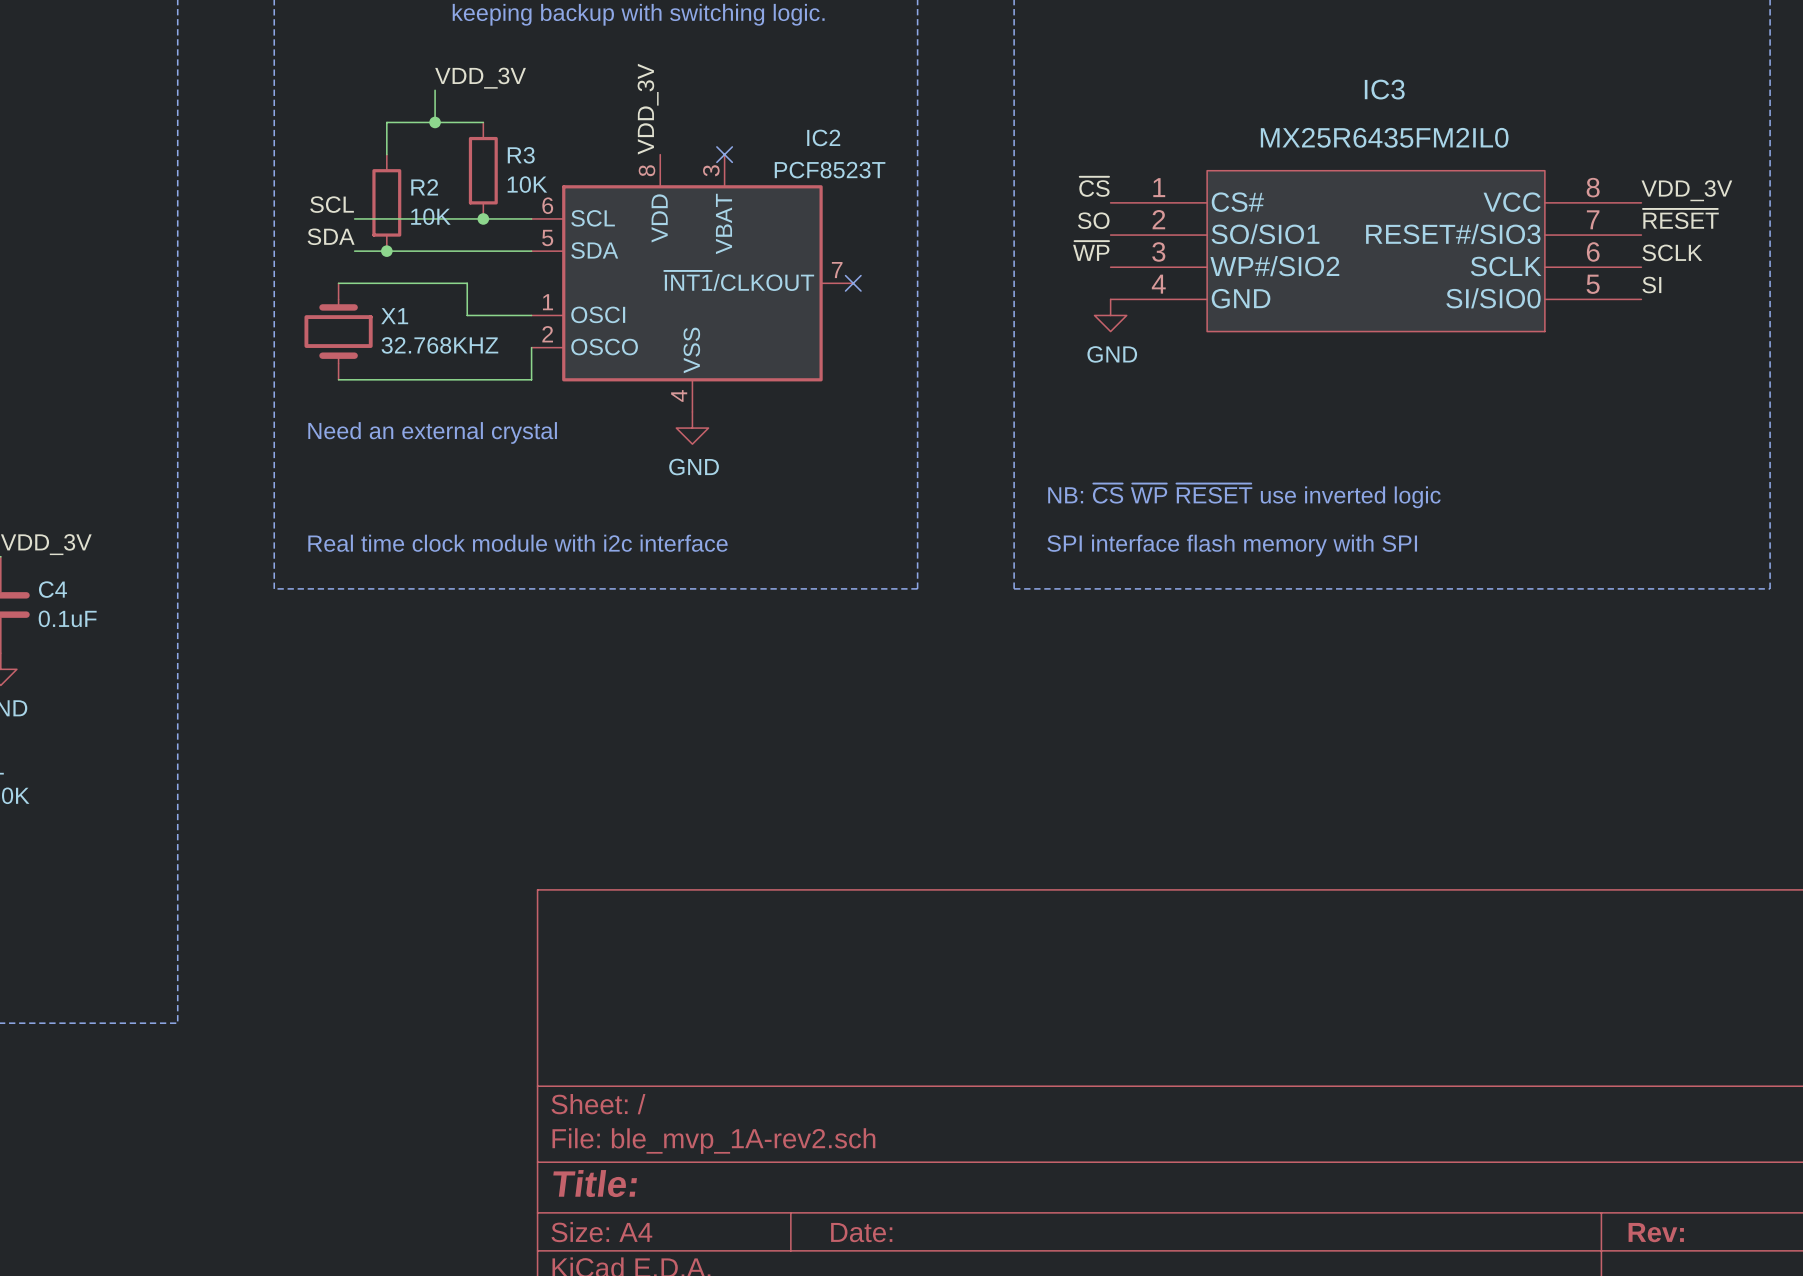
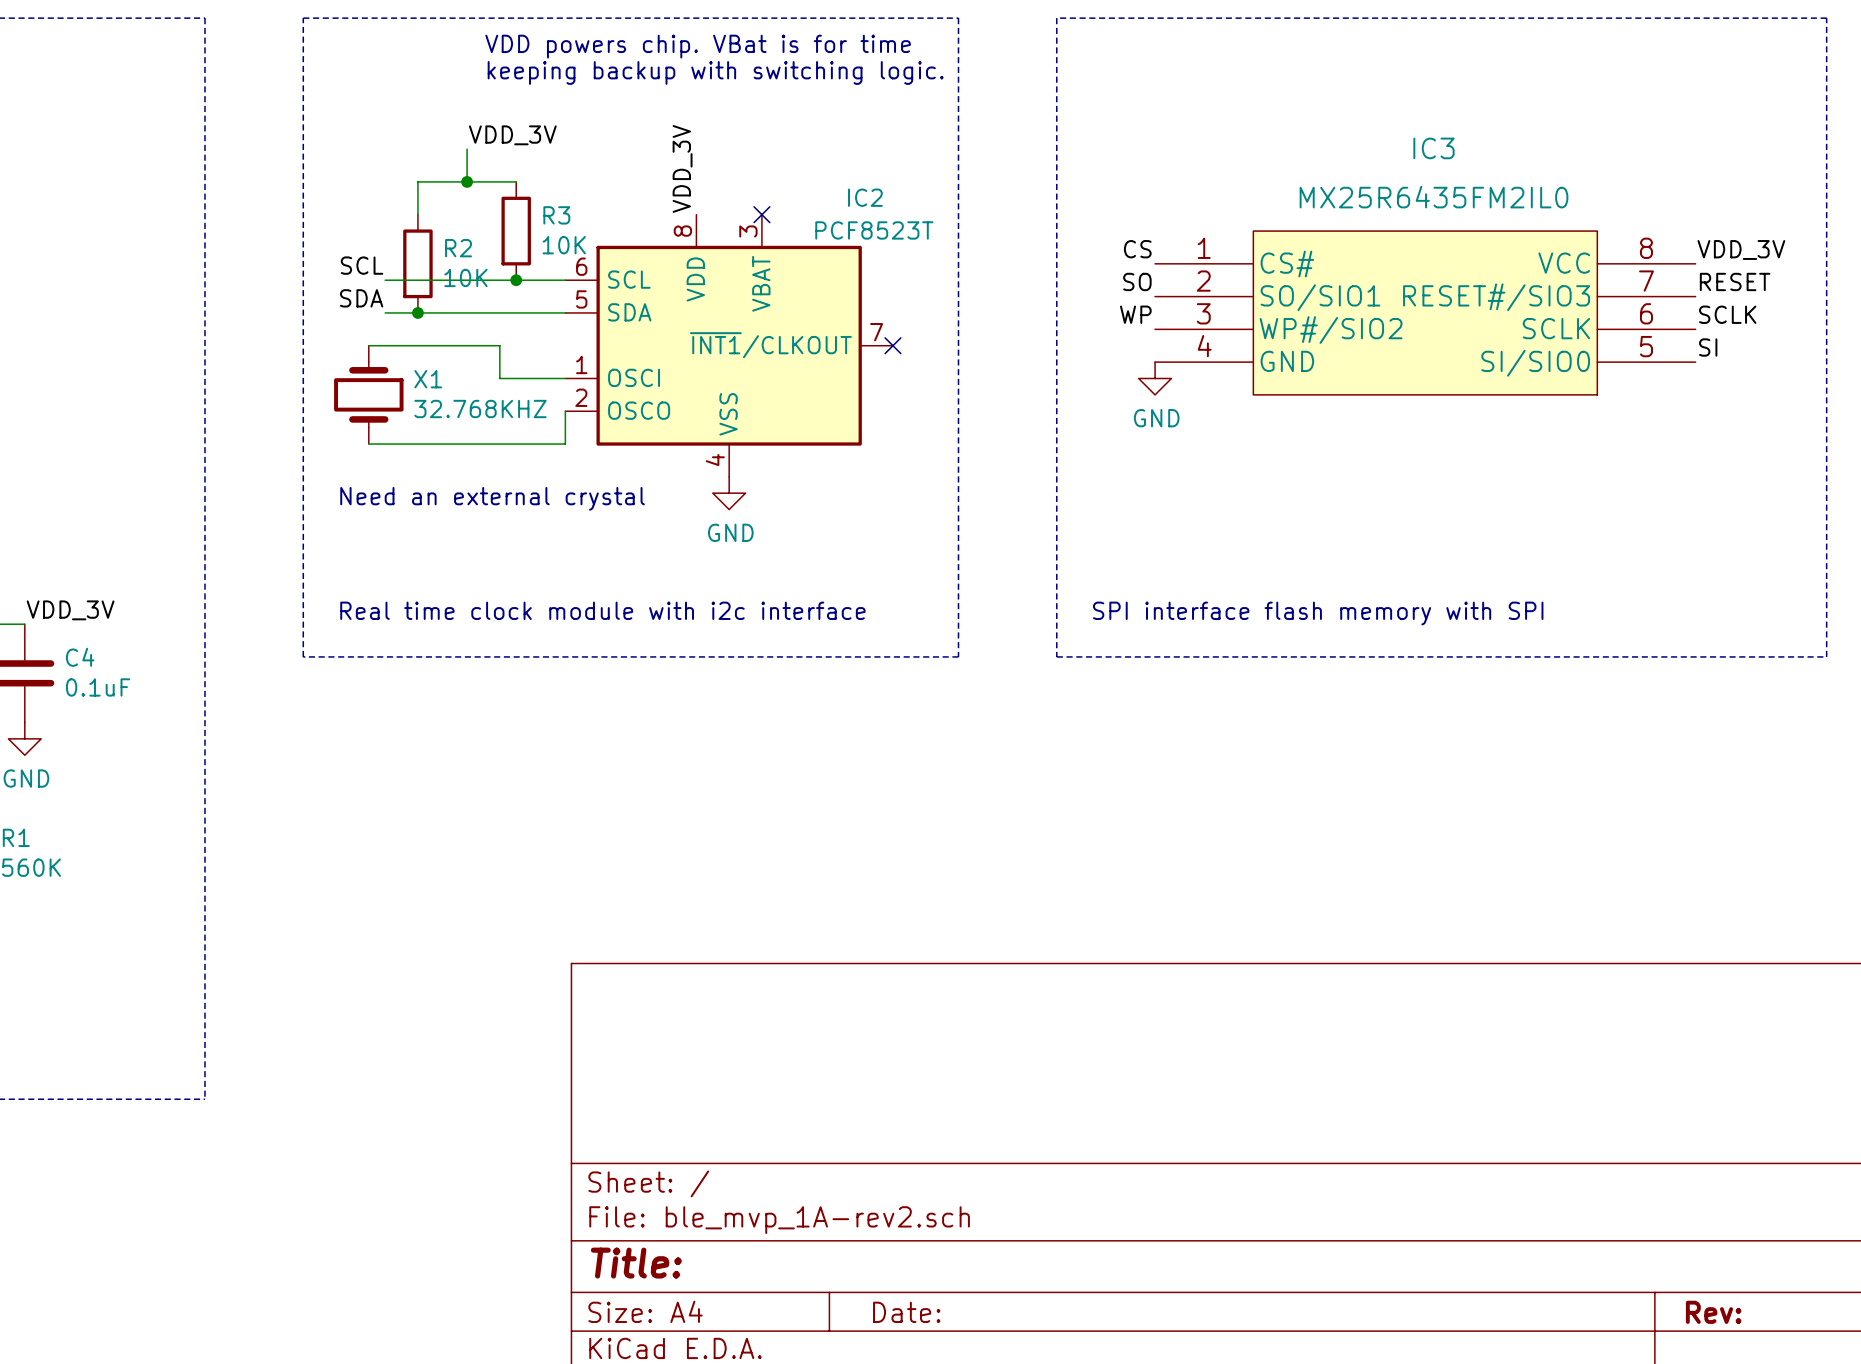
label: ~{CS} (1094, 186) -> CS (1137, 249)
label: ~{RESET} (1680, 218) -> RESET (1735, 281)
label: ~{WP} (1091, 251) -> WP (1135, 314)
text: NB: ~{CS} ~{WP} ~{RESET} use inverted logic (1244, 495) -> none

